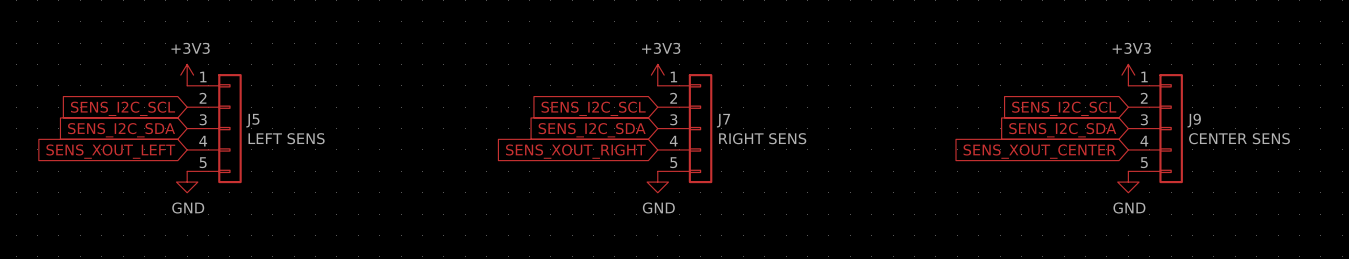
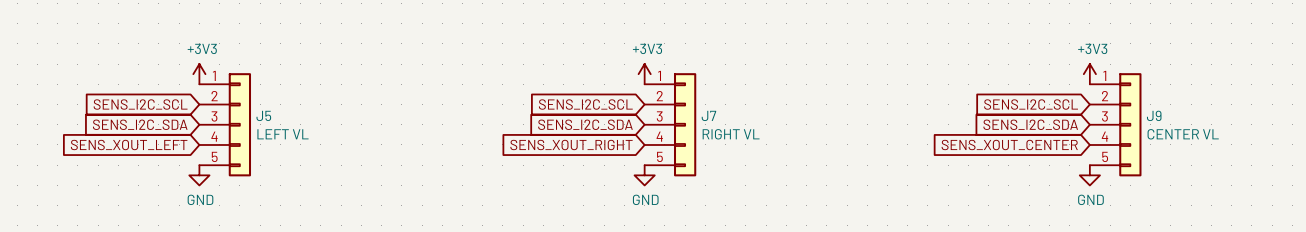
J5 value: LEFT SENS (286, 138) -> LEFT VL (283, 134)
J7 value: RIGHT SENS (762, 138) -> RIGHT VL (731, 134)
J9 value: CENTER SENS (1239, 138) -> CENTER VL (1183, 134)

